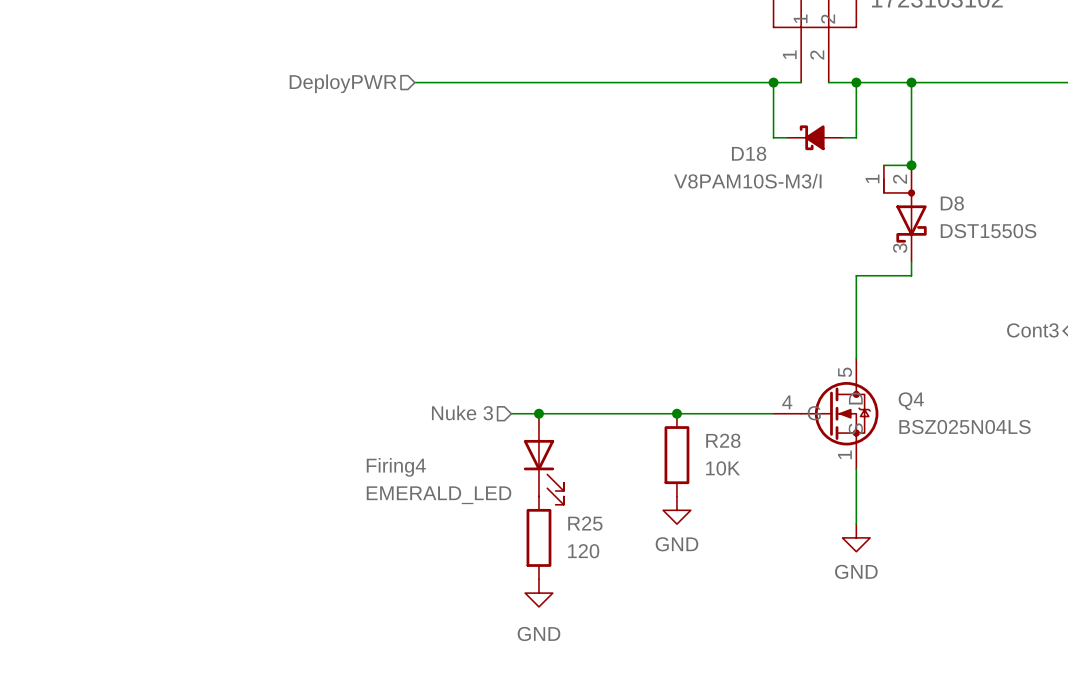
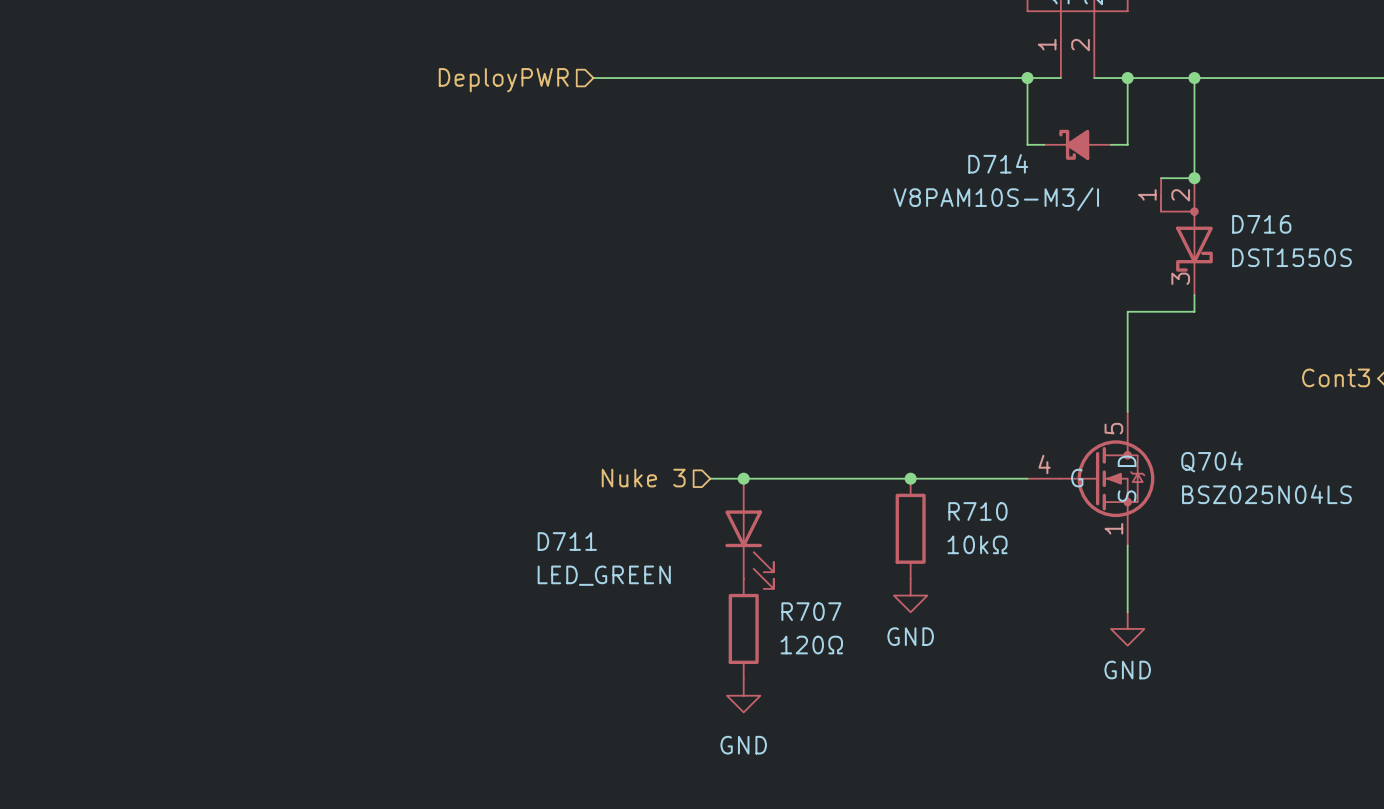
D18 name: D18 (749, 153) -> D714 (998, 163)
D8 name: D8 (952, 203) -> D716 (1261, 224)
Q4 name: Q4 (911, 401) -> Q704 (1212, 461)
R28 name: R28 (723, 440) -> R710 (977, 511)
Firing4 name: Firing4 (396, 467) -> D711 (567, 541)
R28 value: 10K (723, 468) -> 10kΩ (977, 544)
Firing4 value: EMERALD_LED (439, 495) -> LED_GREEN (604, 575)
R25 name: R25 (585, 523) -> R707 (811, 611)
R25 value: 120 (583, 551) -> 120Ω (811, 645)

